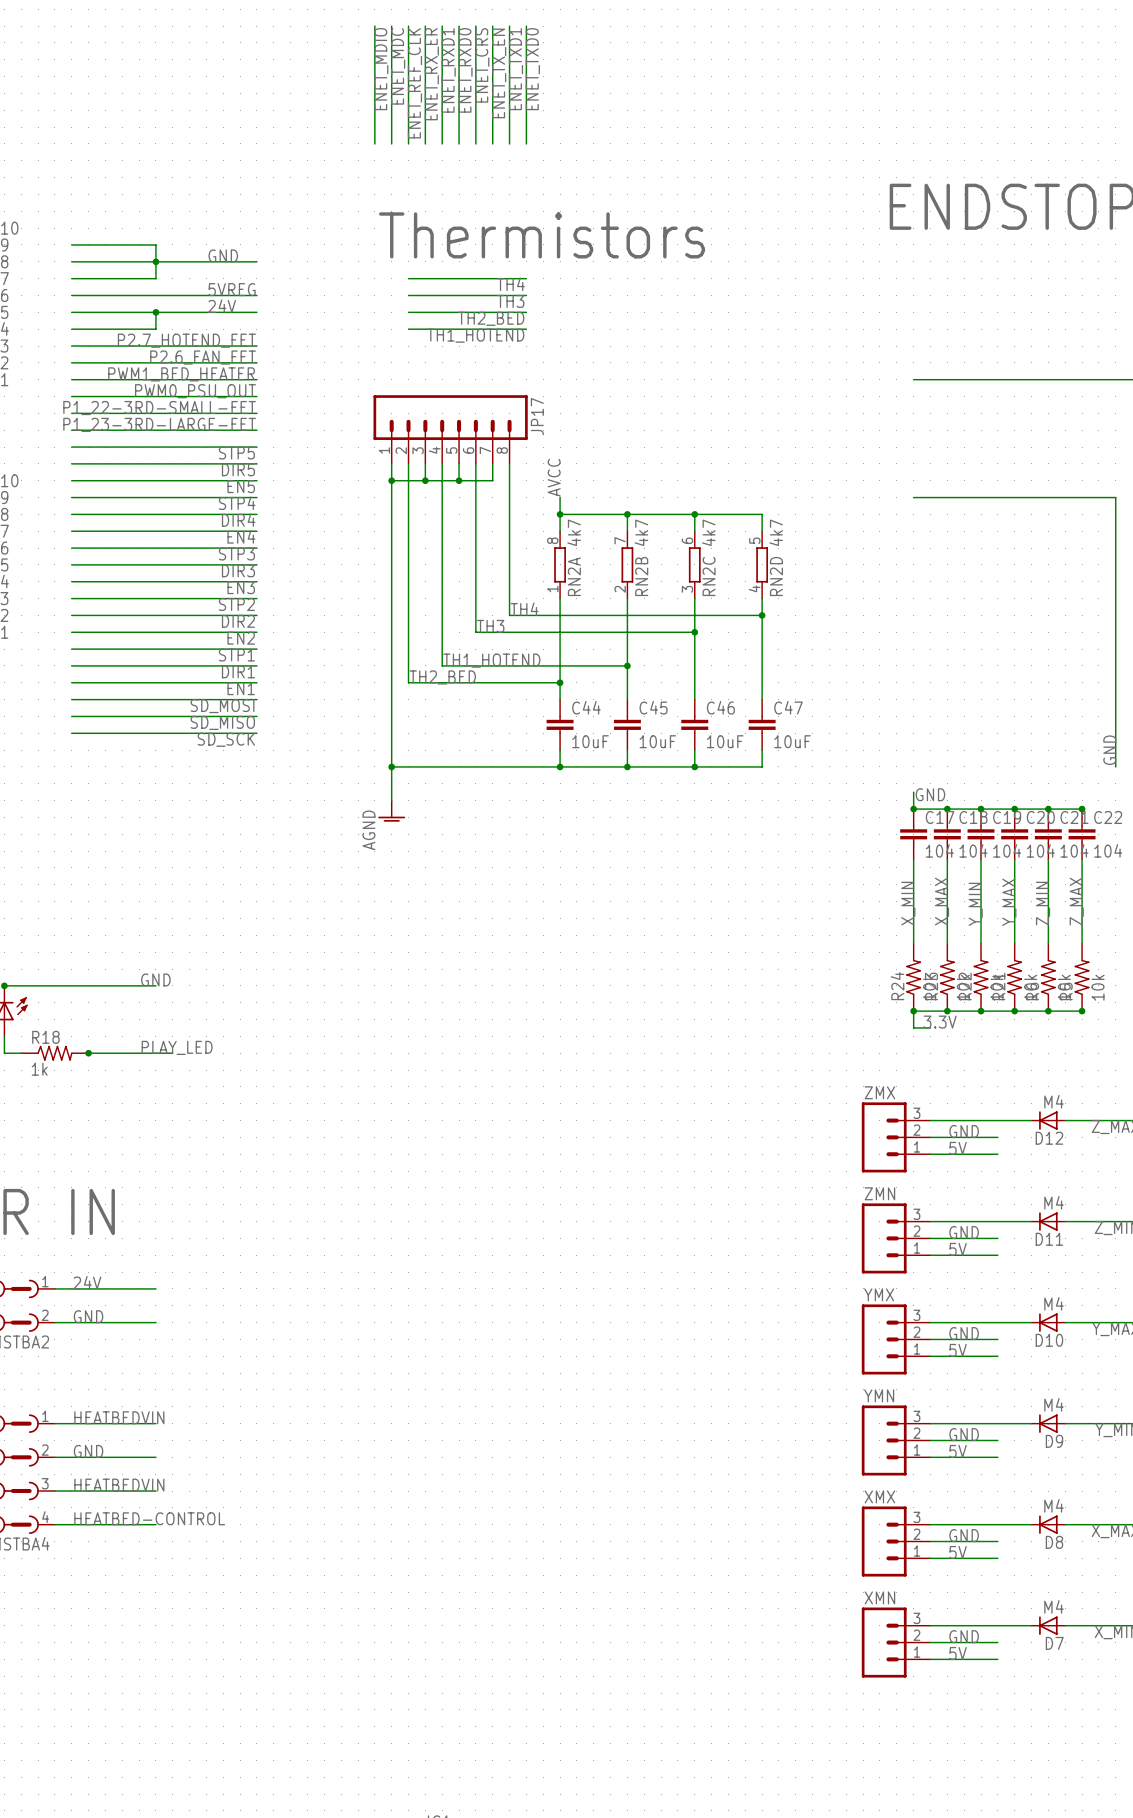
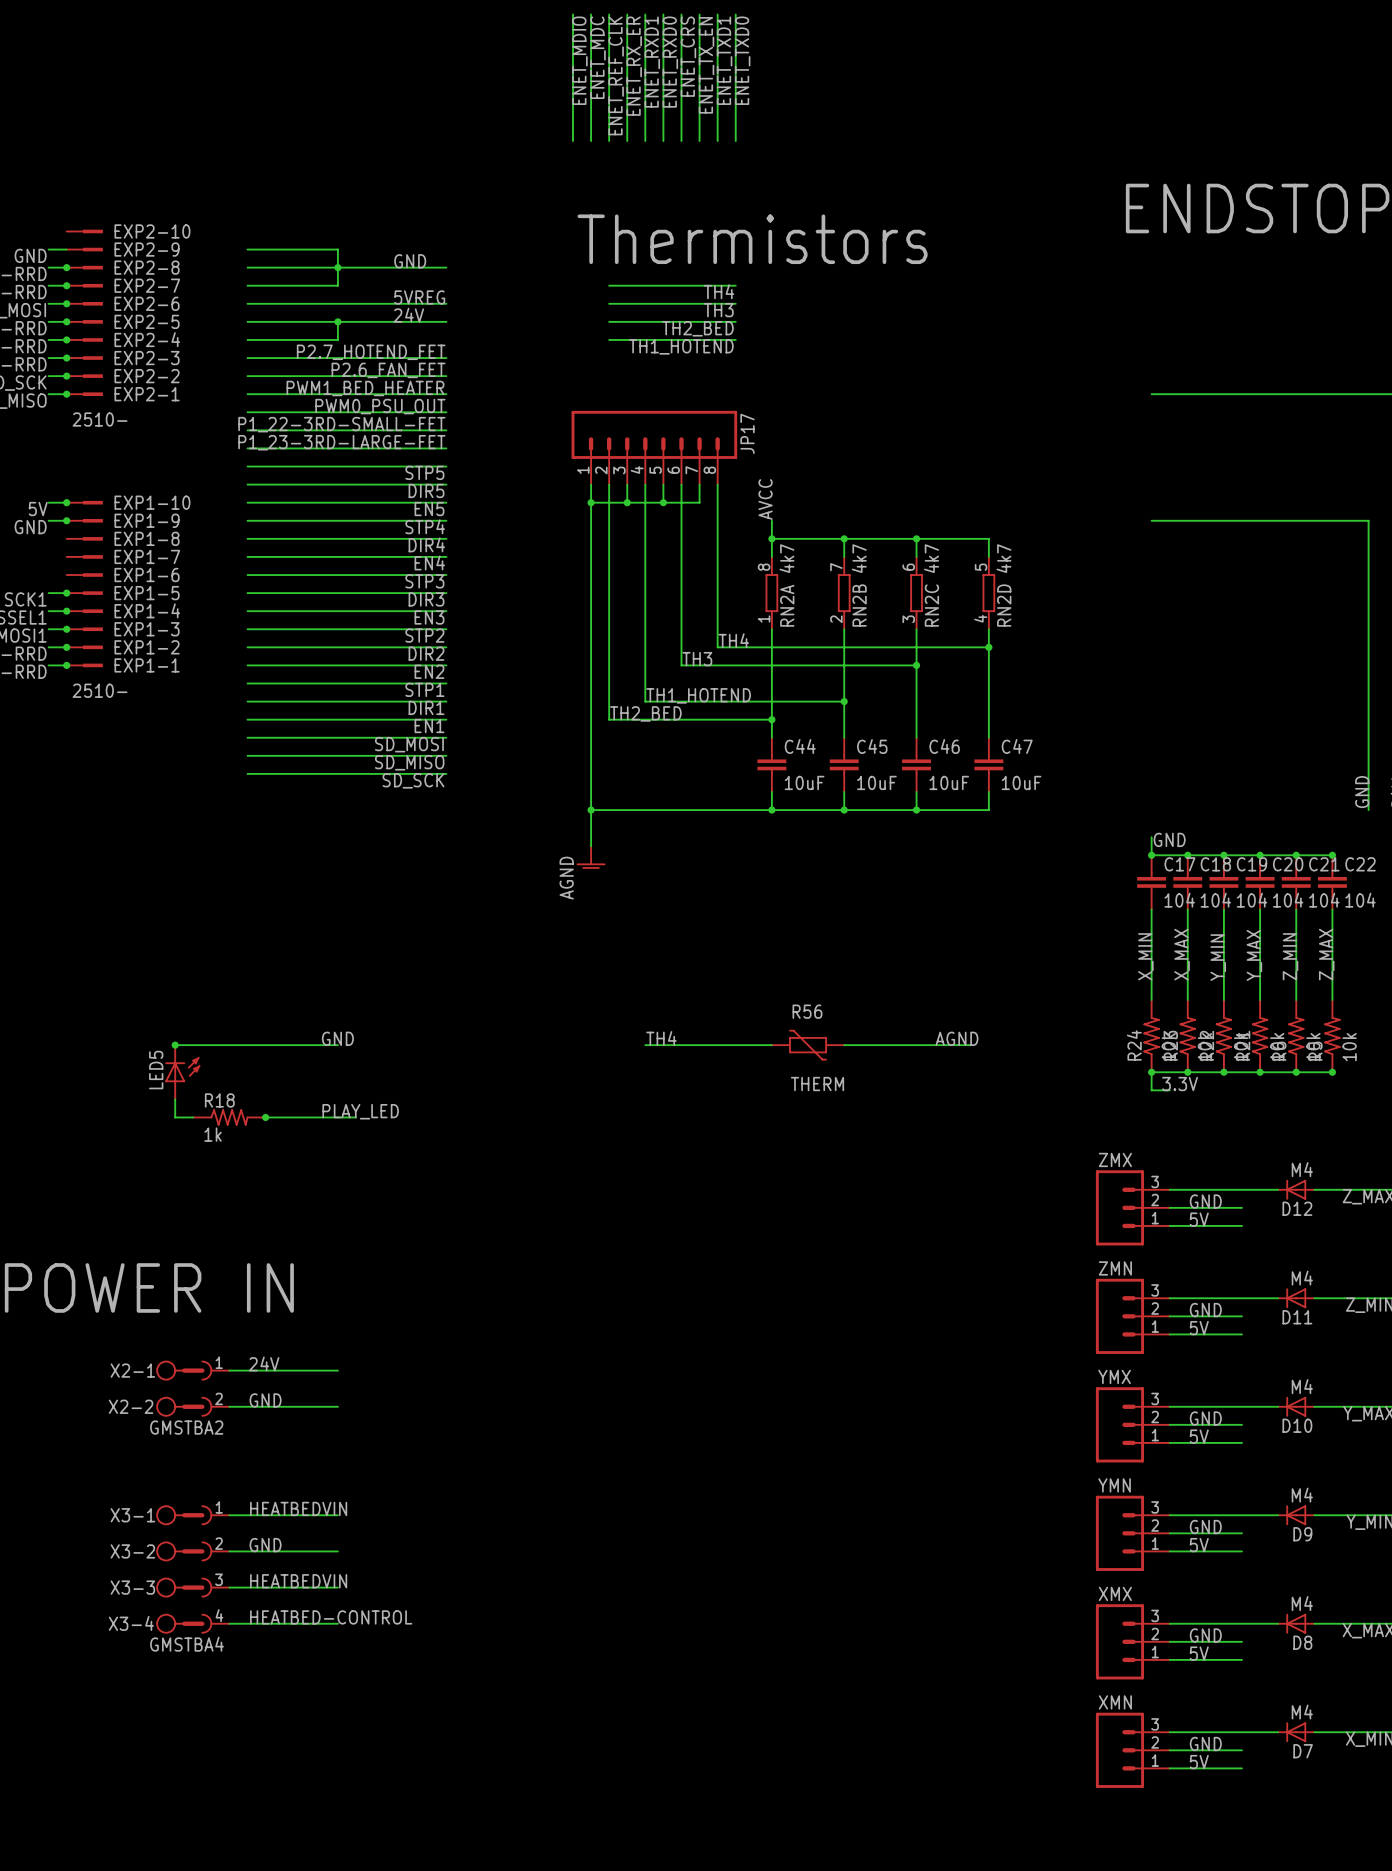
label: none -> TH4 (661, 1038)
label: none -> AGND (956, 1038)
wire: none -> (645, 1045) (771, 1045)
R56: none -> THERM (808, 1045)
wire: none -> (844, 1045) (970, 1045)

